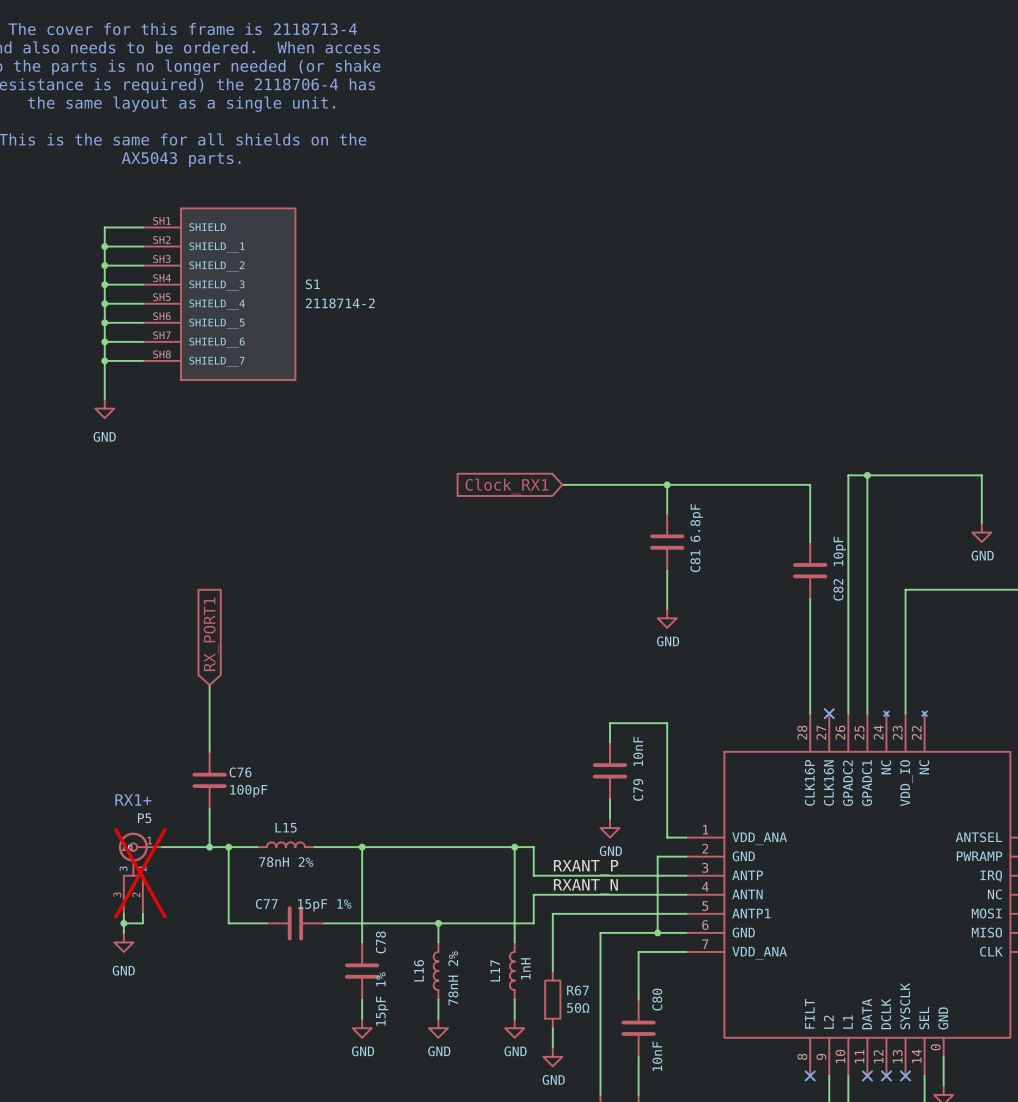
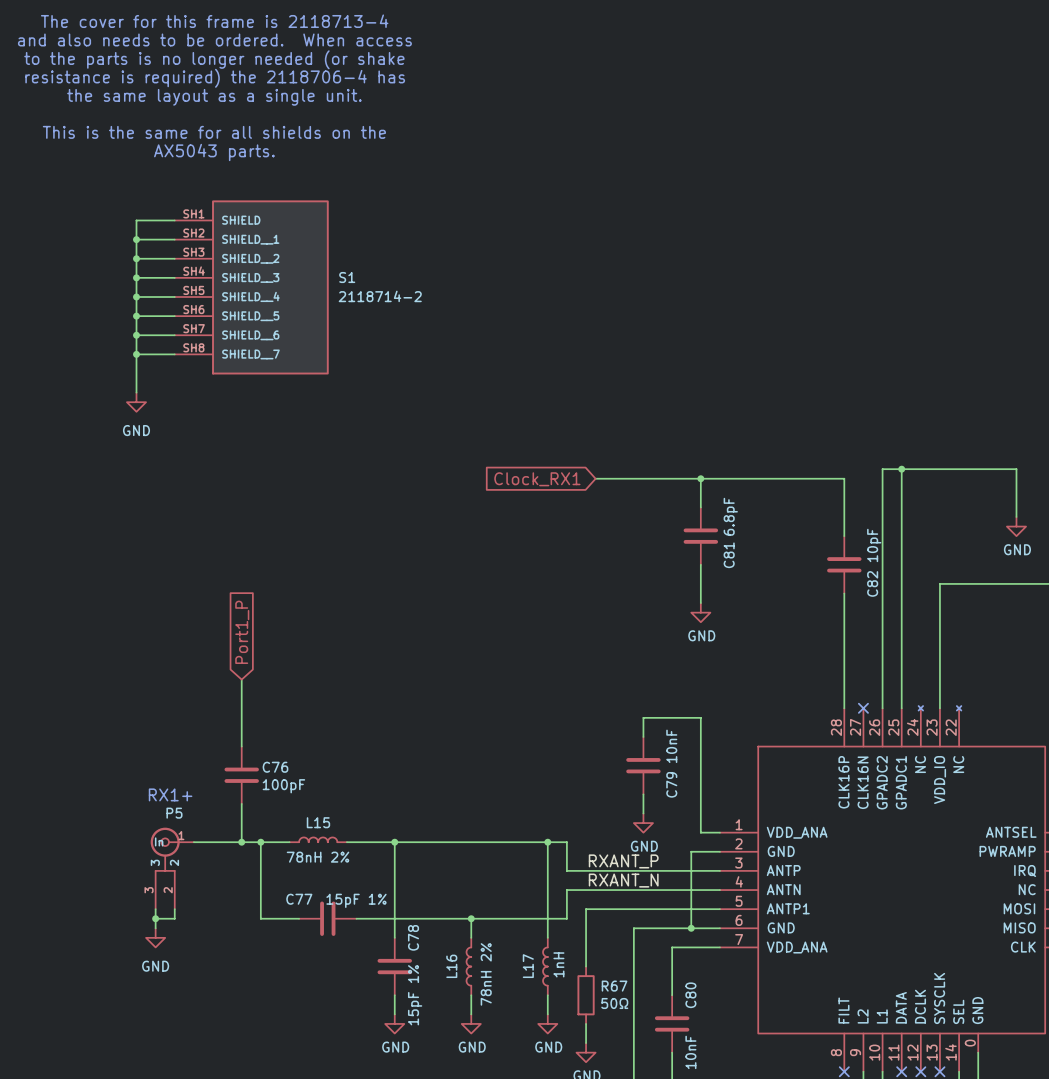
global label: RX_PORT1 (211, 634) -> Port1_P (242, 632)
P5 do-not-place cross: (140, 873) -> none

